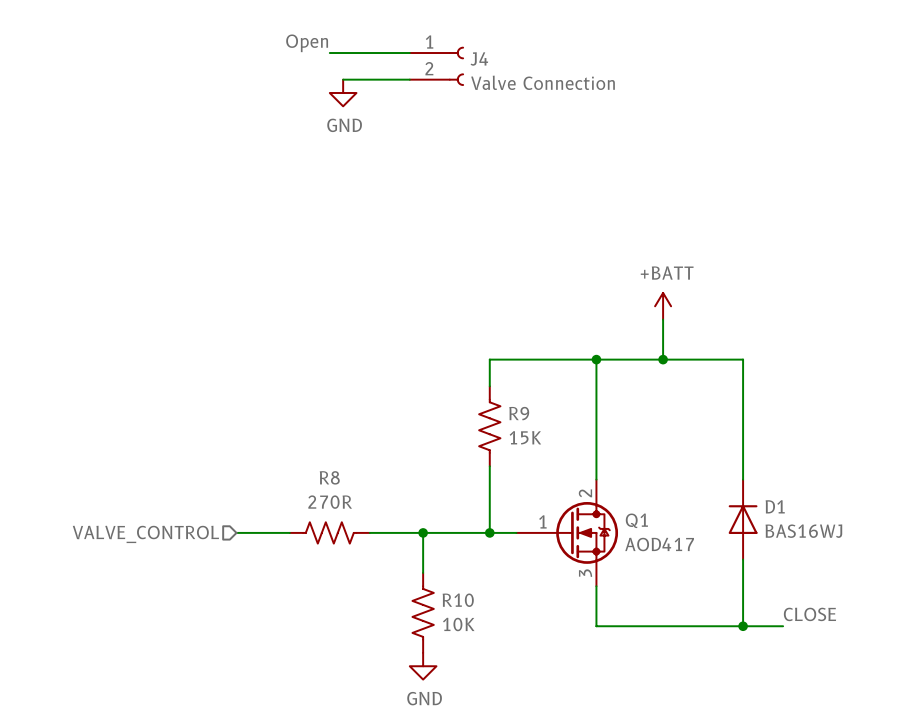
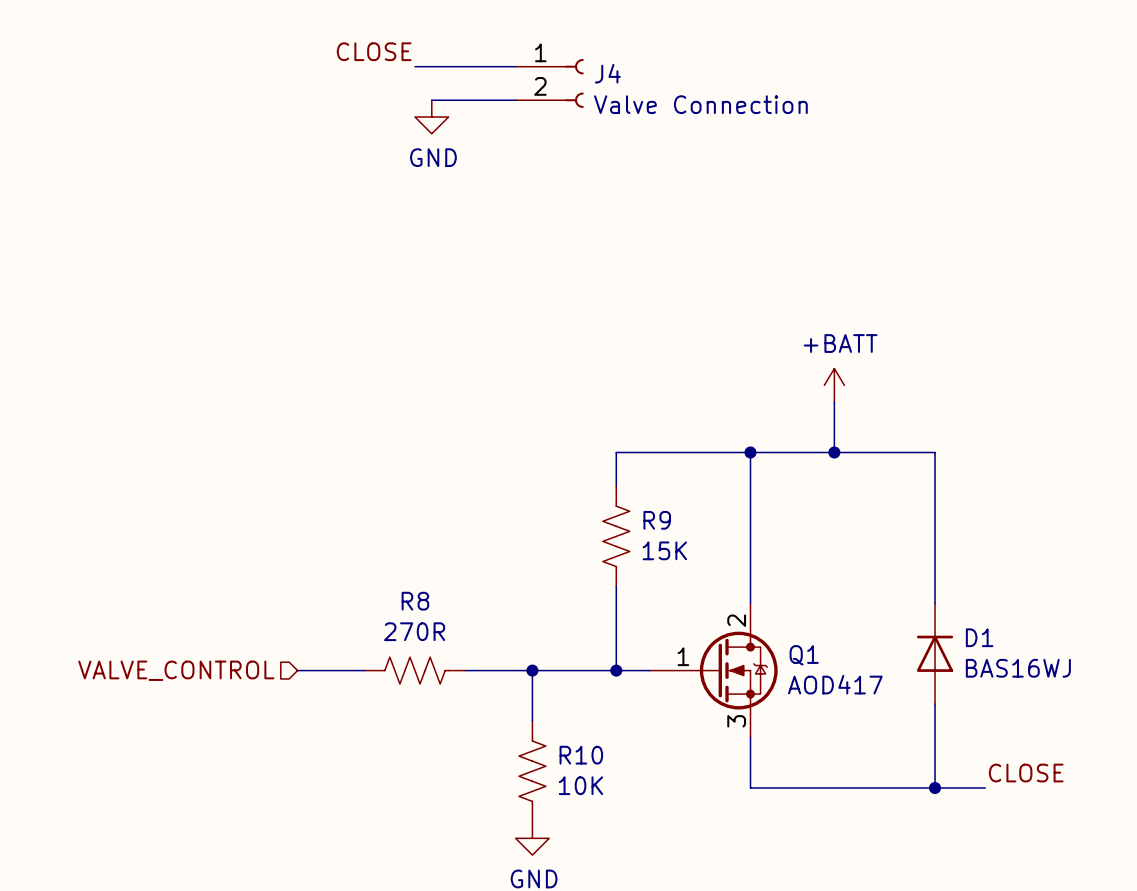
label: Open (307, 43) -> CLOSE (374, 51)

